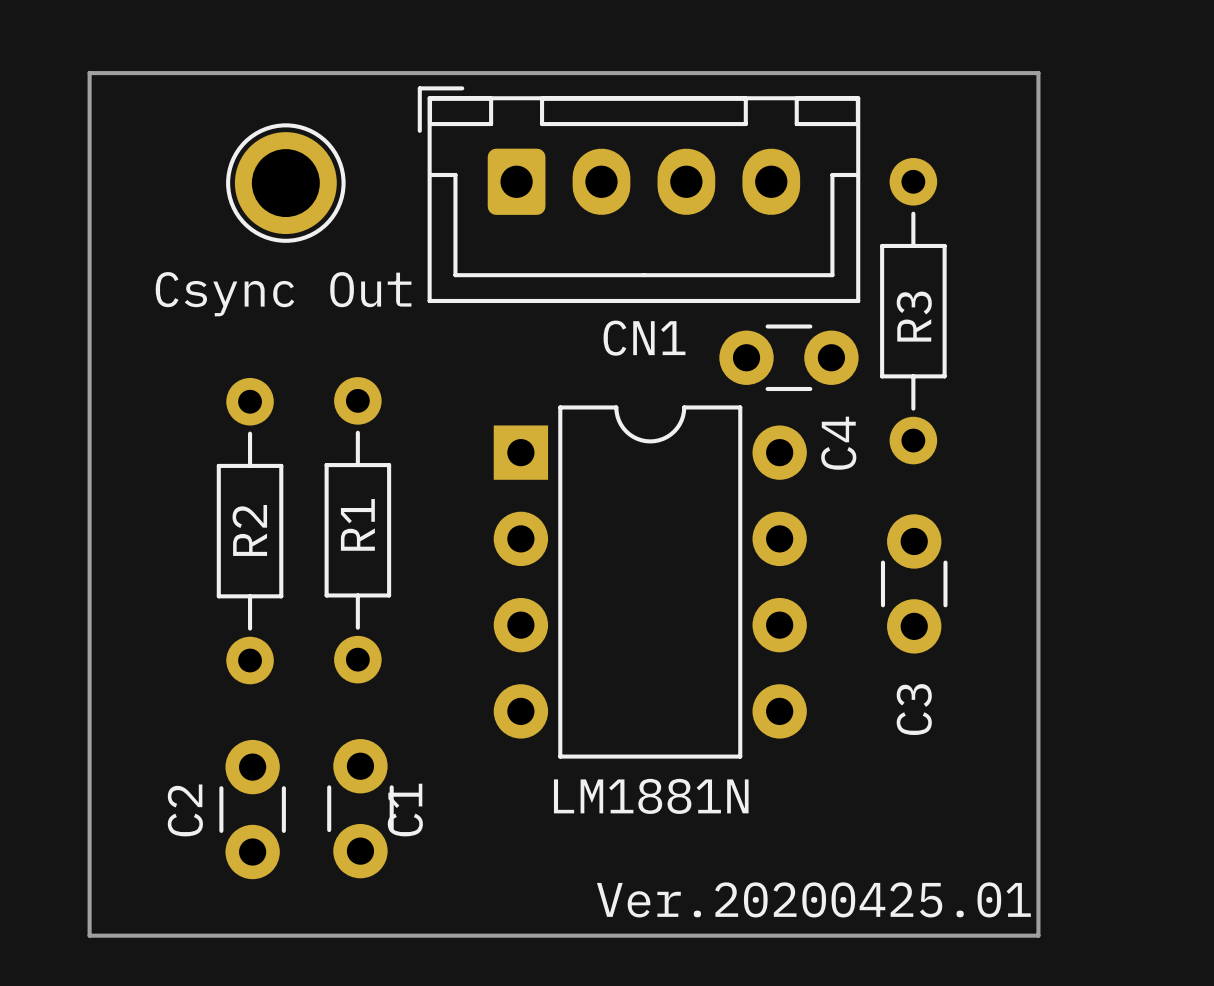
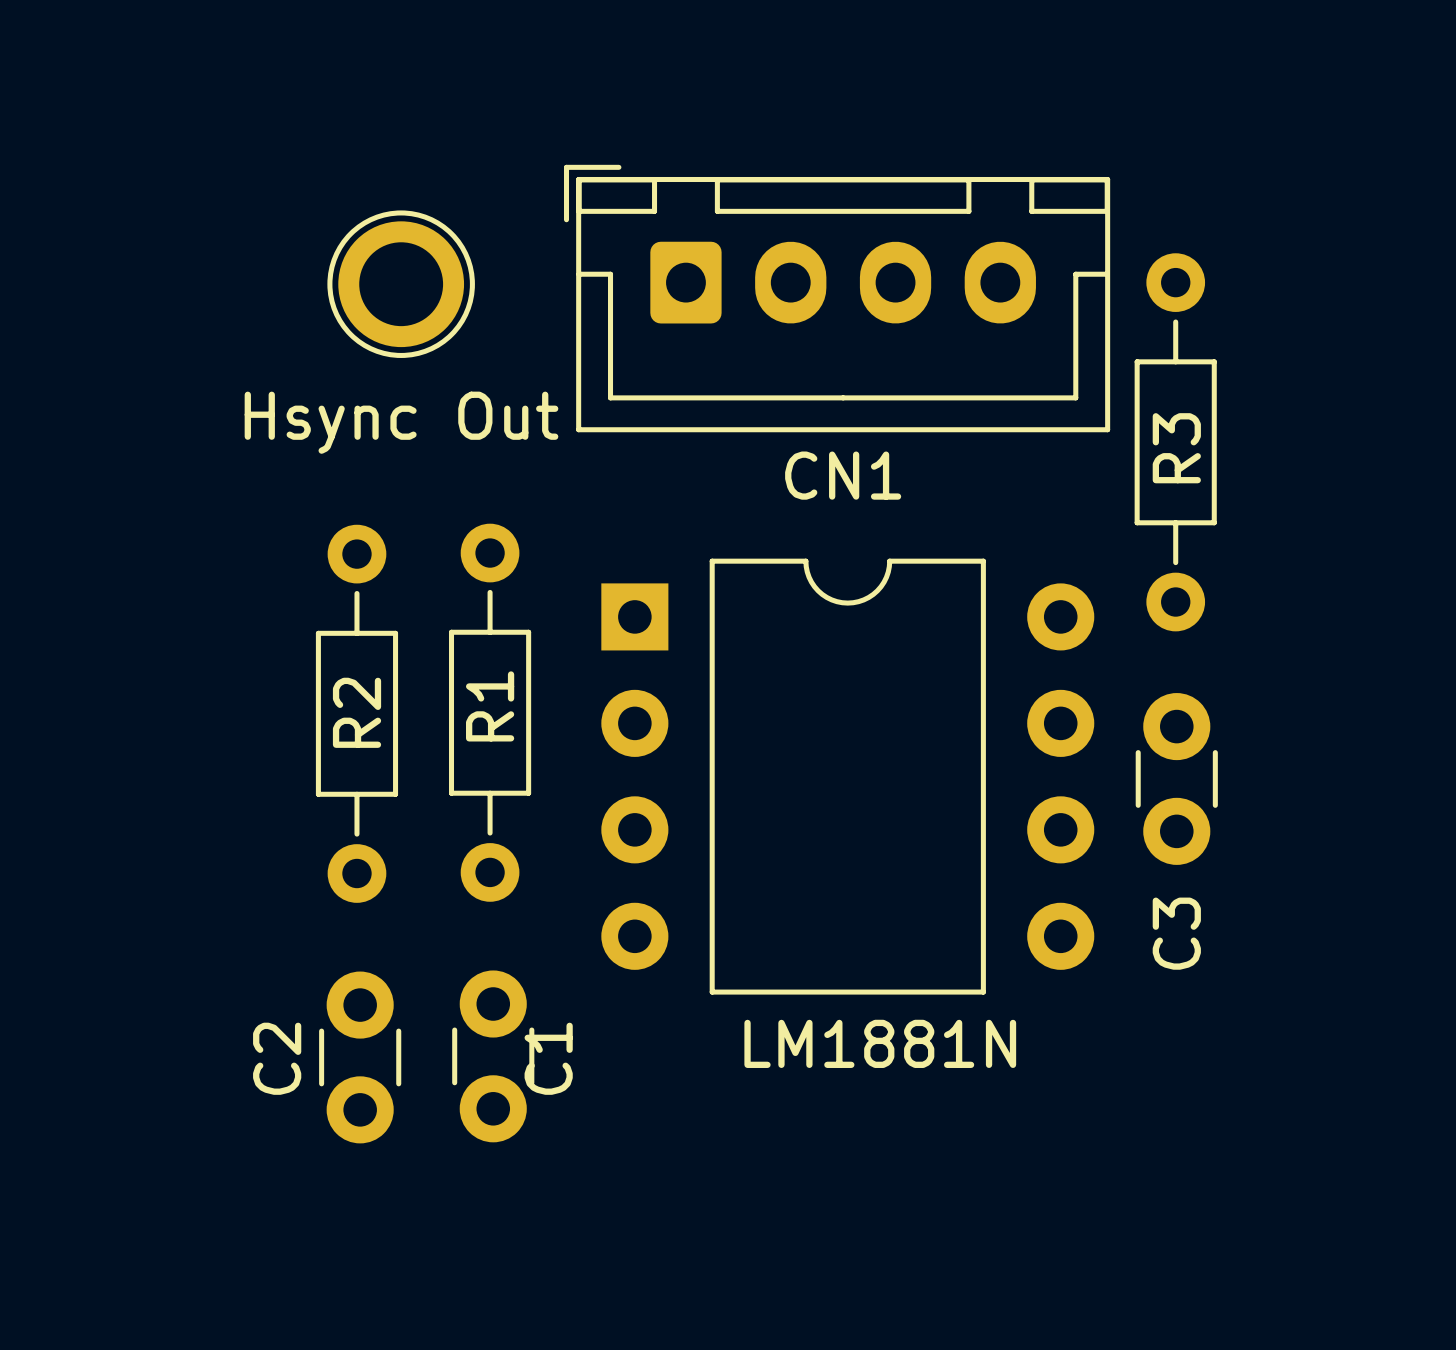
board edge: (89, 73) (1038, 73) (1038, 935) (89, 935) (89, 73) -> none
Csync Out name: Csync Out (283, 294) -> Hsync Out (401, 422)
C4: (788, 357) -> none
LM1881N footprint: [493, 405, 807, 759] -> [601, 558, 1095, 995]
text: Ver.20200425.01 (813, 899) -> none

